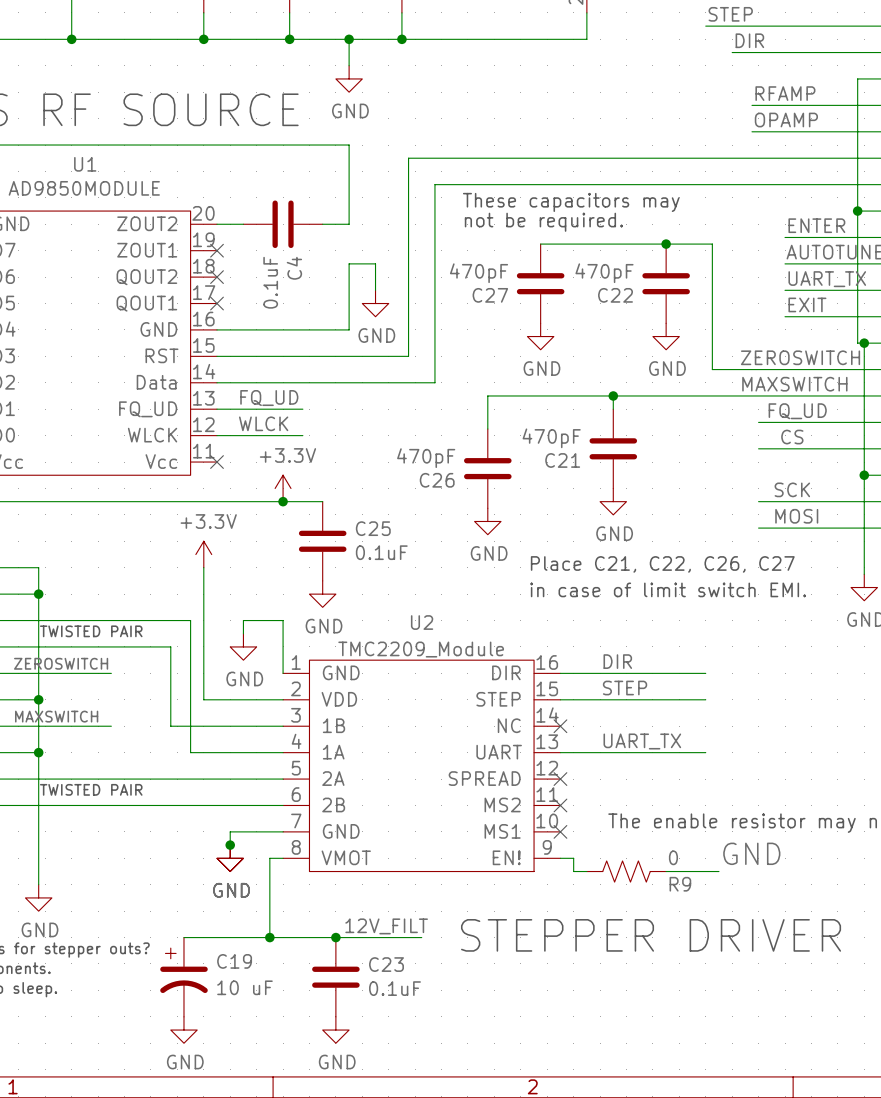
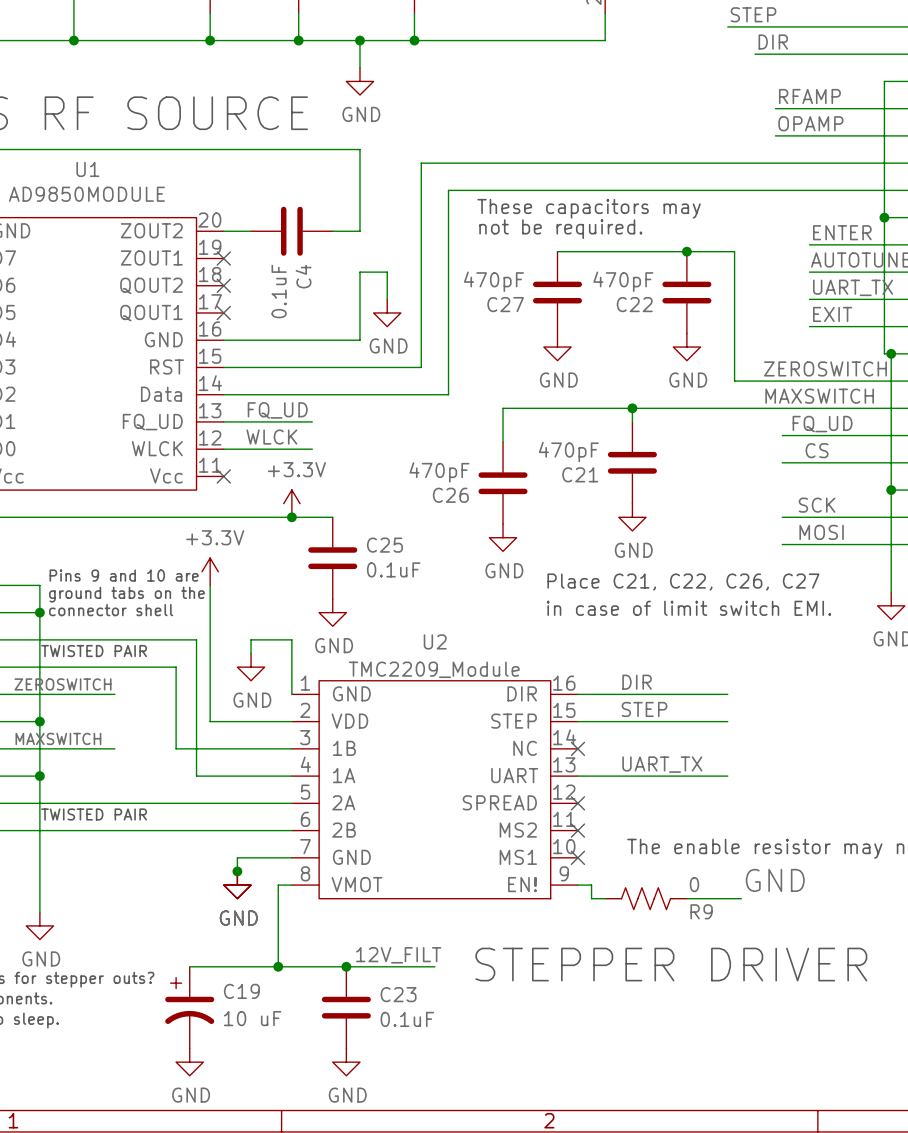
text: none -> Pins 9 and 10 are (124, 575)
text: none -> ground tabs on the (126, 594)
text: none -> connector shell (111, 610)

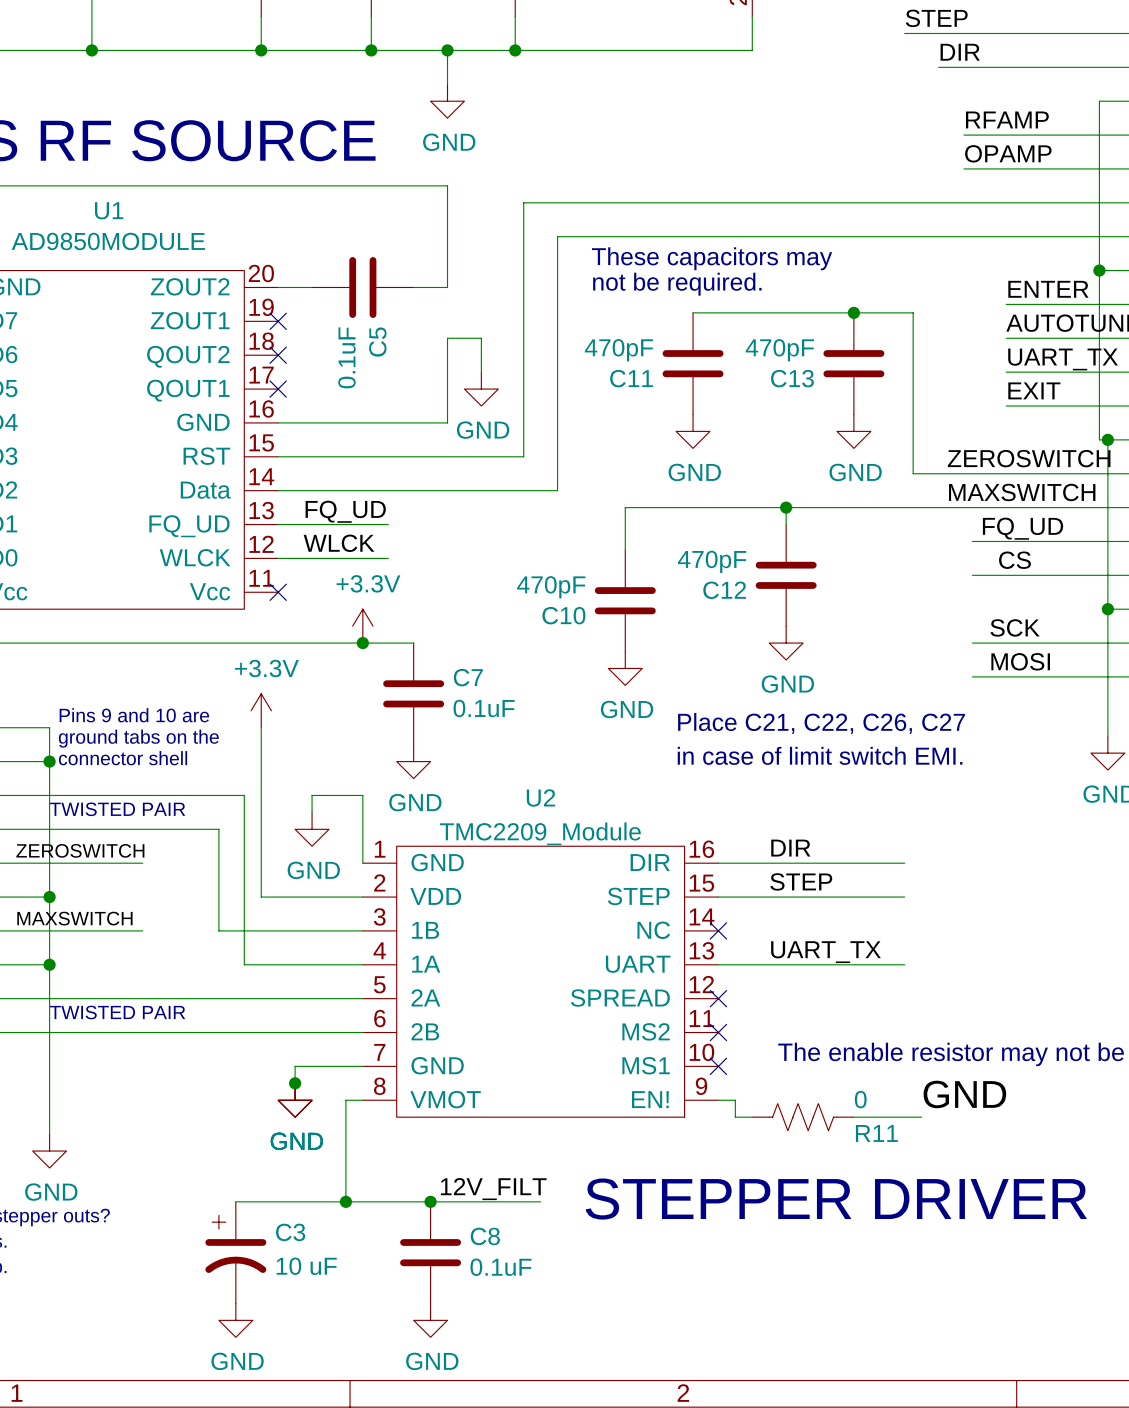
C4 name: C4 (303, 276) -> C5 (377, 342)
C27 name: C27 (505, 304) -> C11 (631, 378)
C22 name: C22 (634, 304) -> C13 (792, 378)
C21 name: C21 (580, 474) -> C12 (724, 590)
C26 name: C26 (450, 495) -> C10 (563, 615)
C25 name: C25 (384, 545) -> C7 (468, 677)
R9 name: R9 (701, 911) -> R11 (876, 1133)
C19 name: C19 (241, 991) -> C3 (290, 1232)
C23 name: C23 (398, 994) -> C8 (485, 1236)

